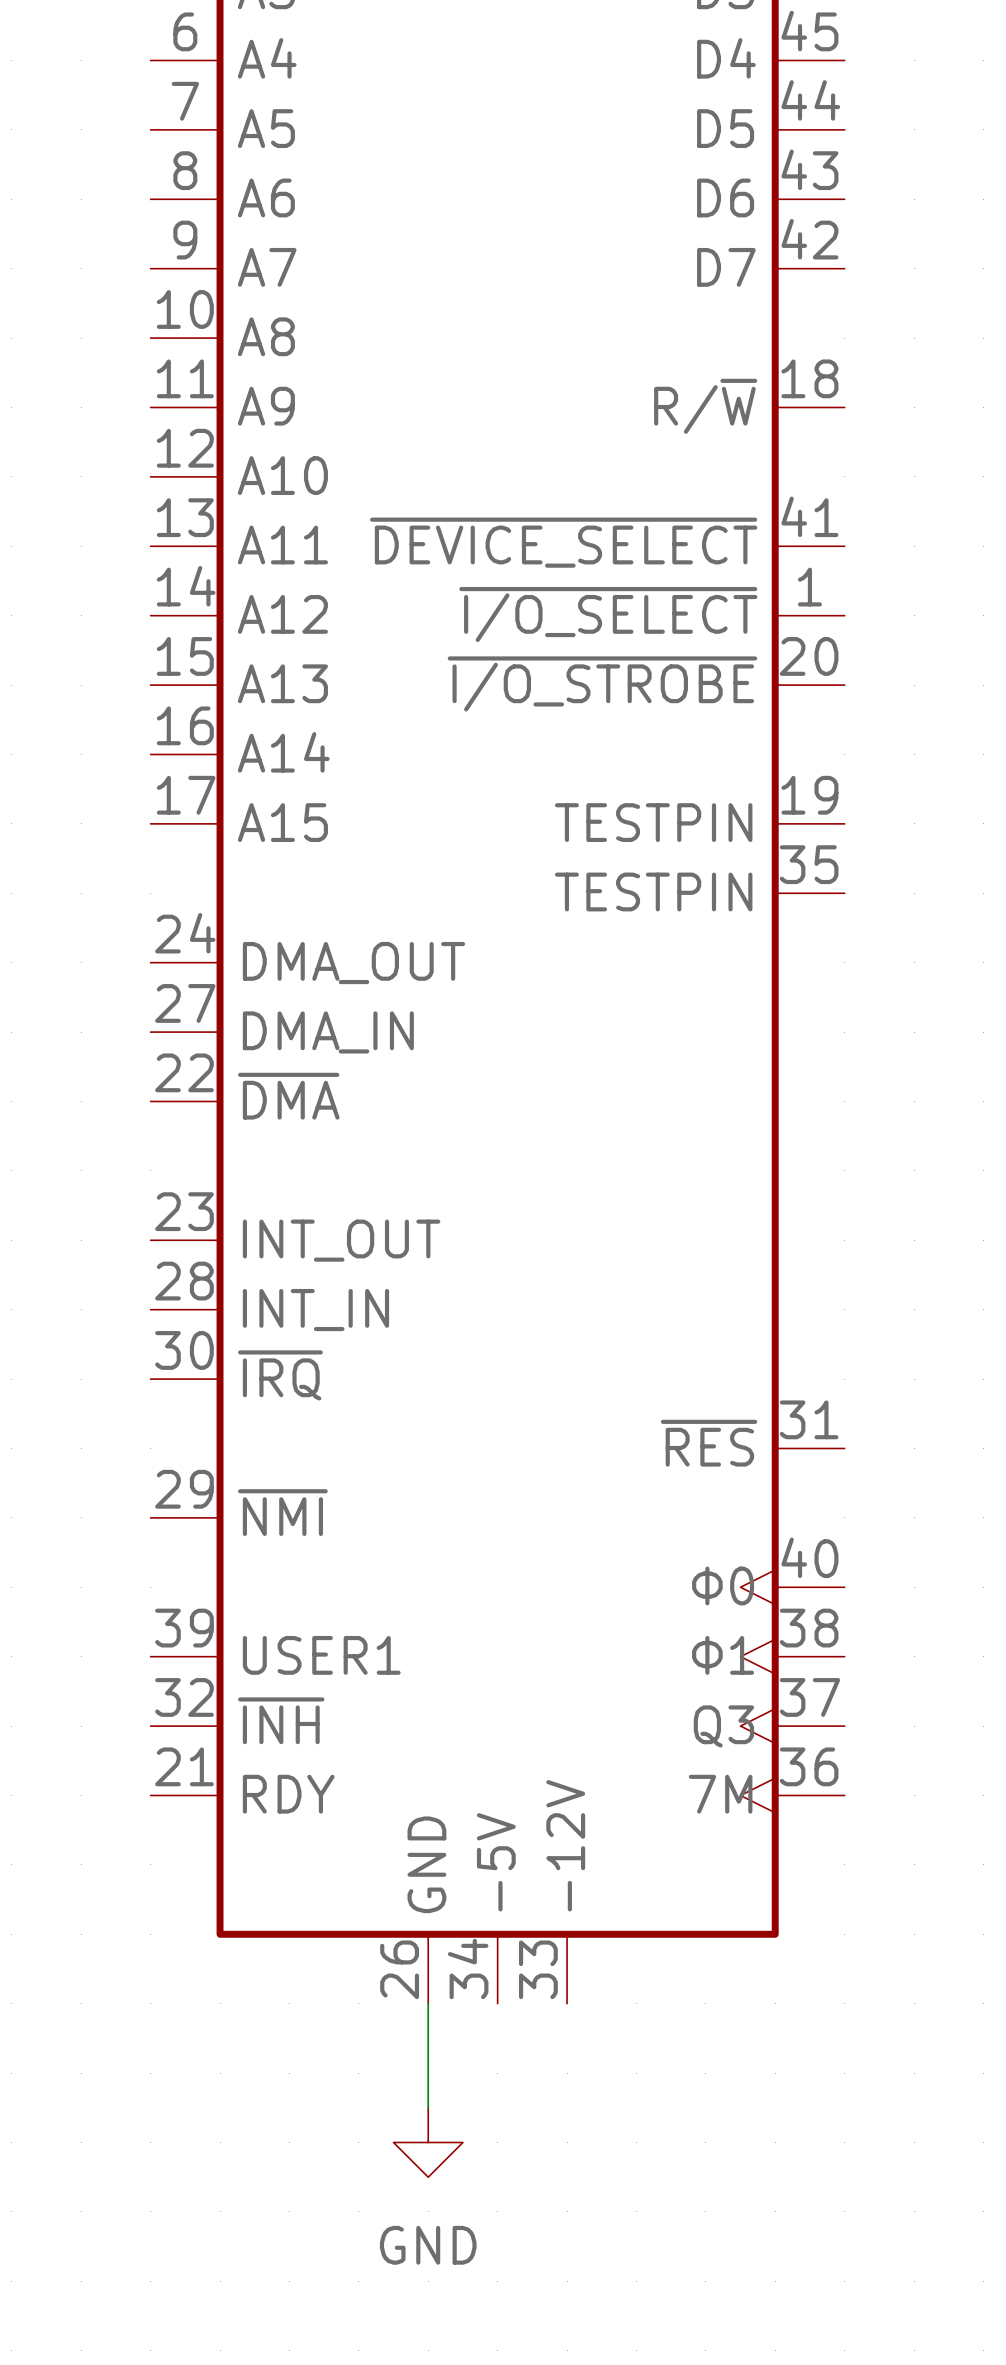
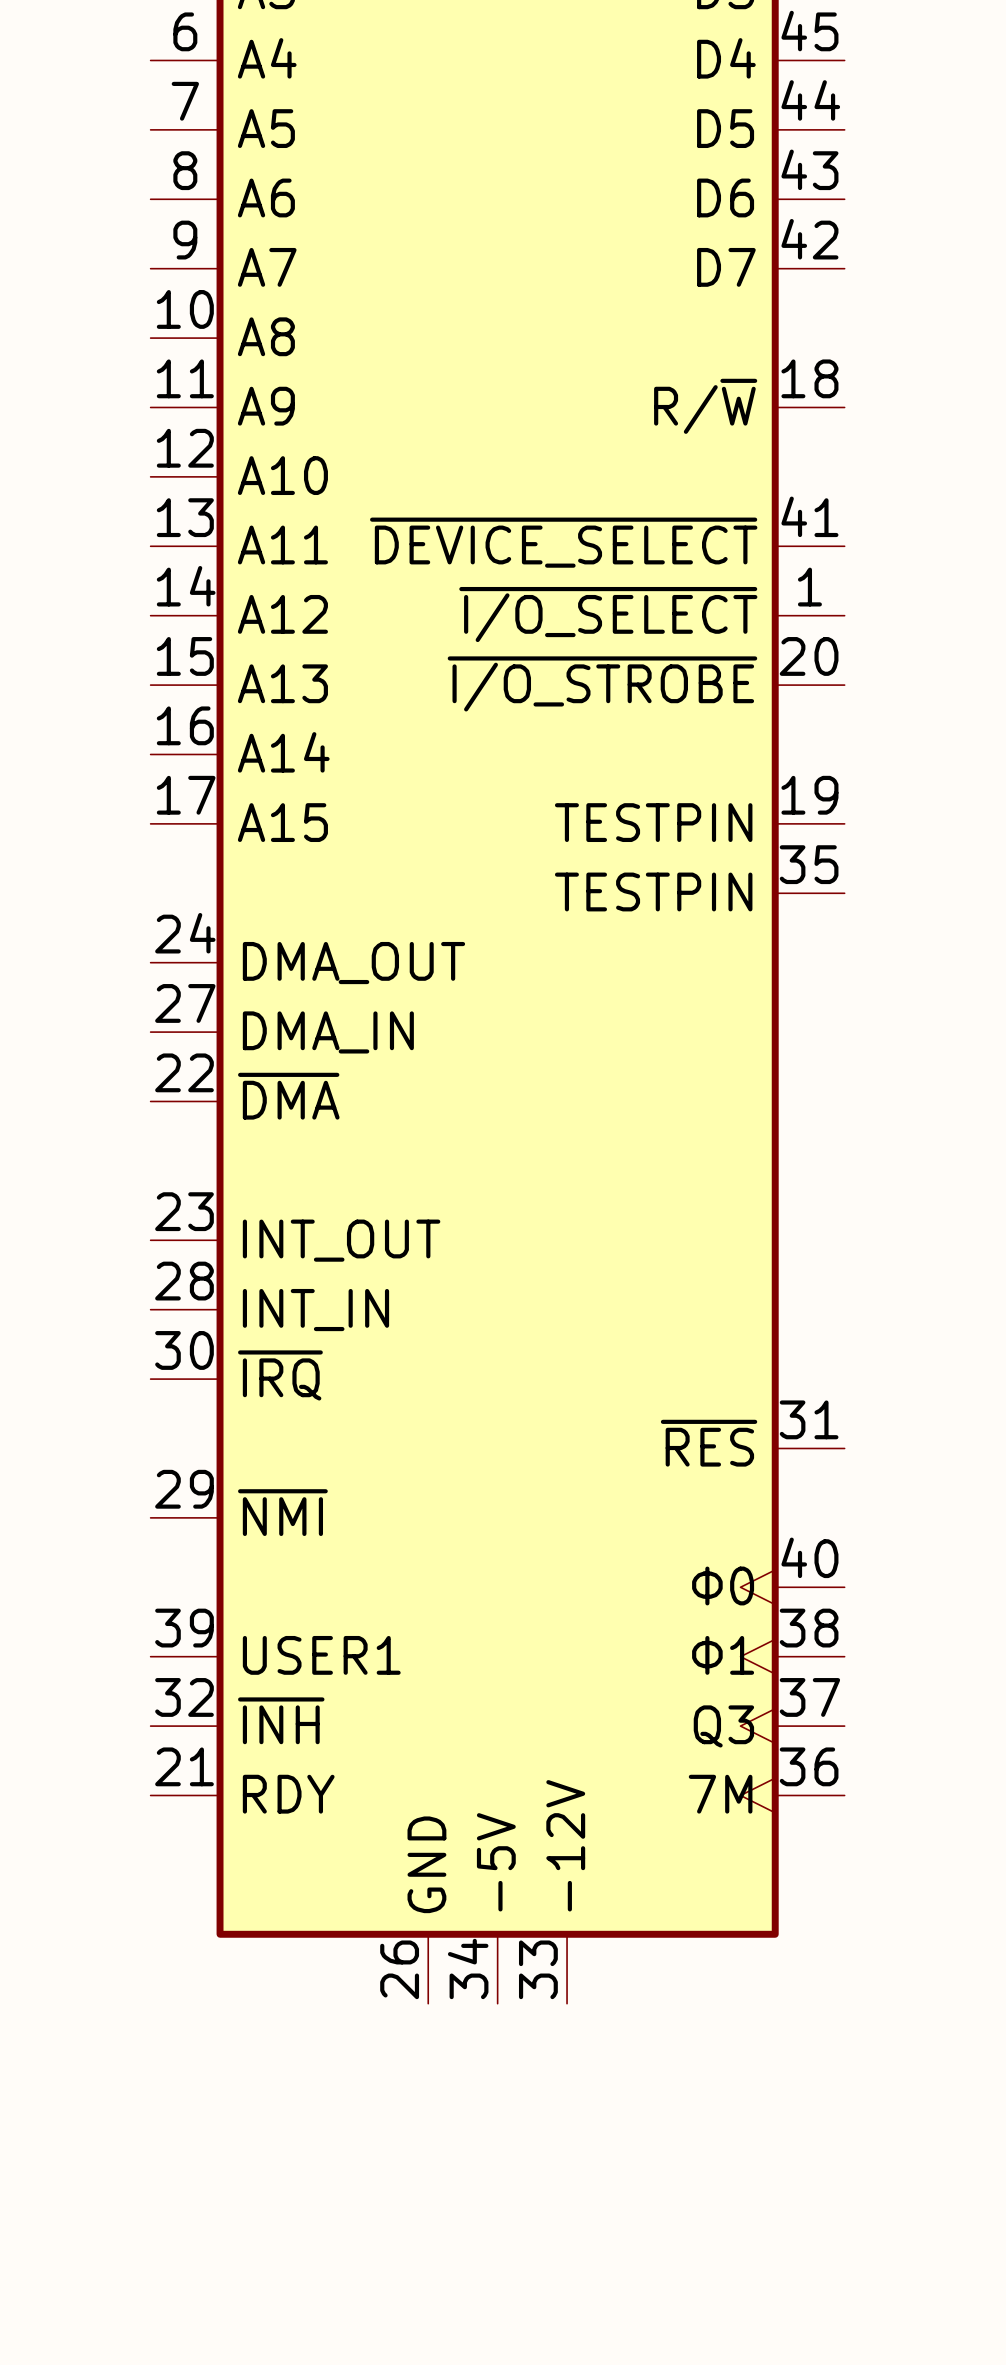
wire: (428, 2003) (428, 2107) -> none
power symbol: GND (428, 2142) -> none

